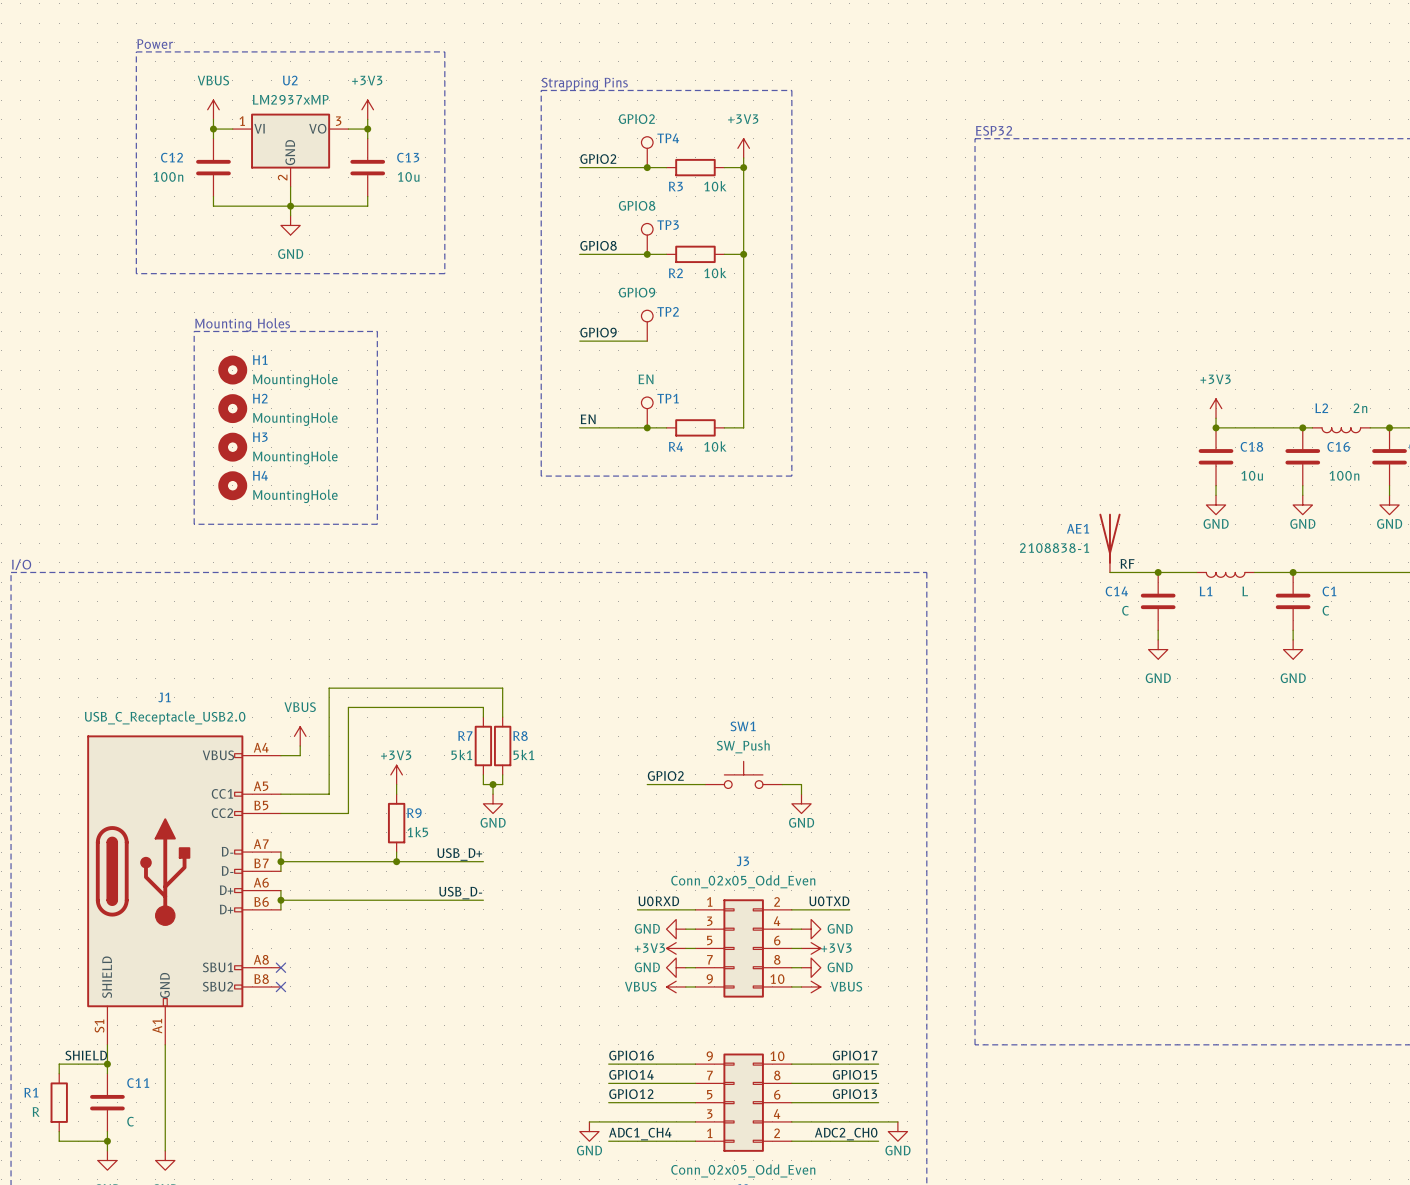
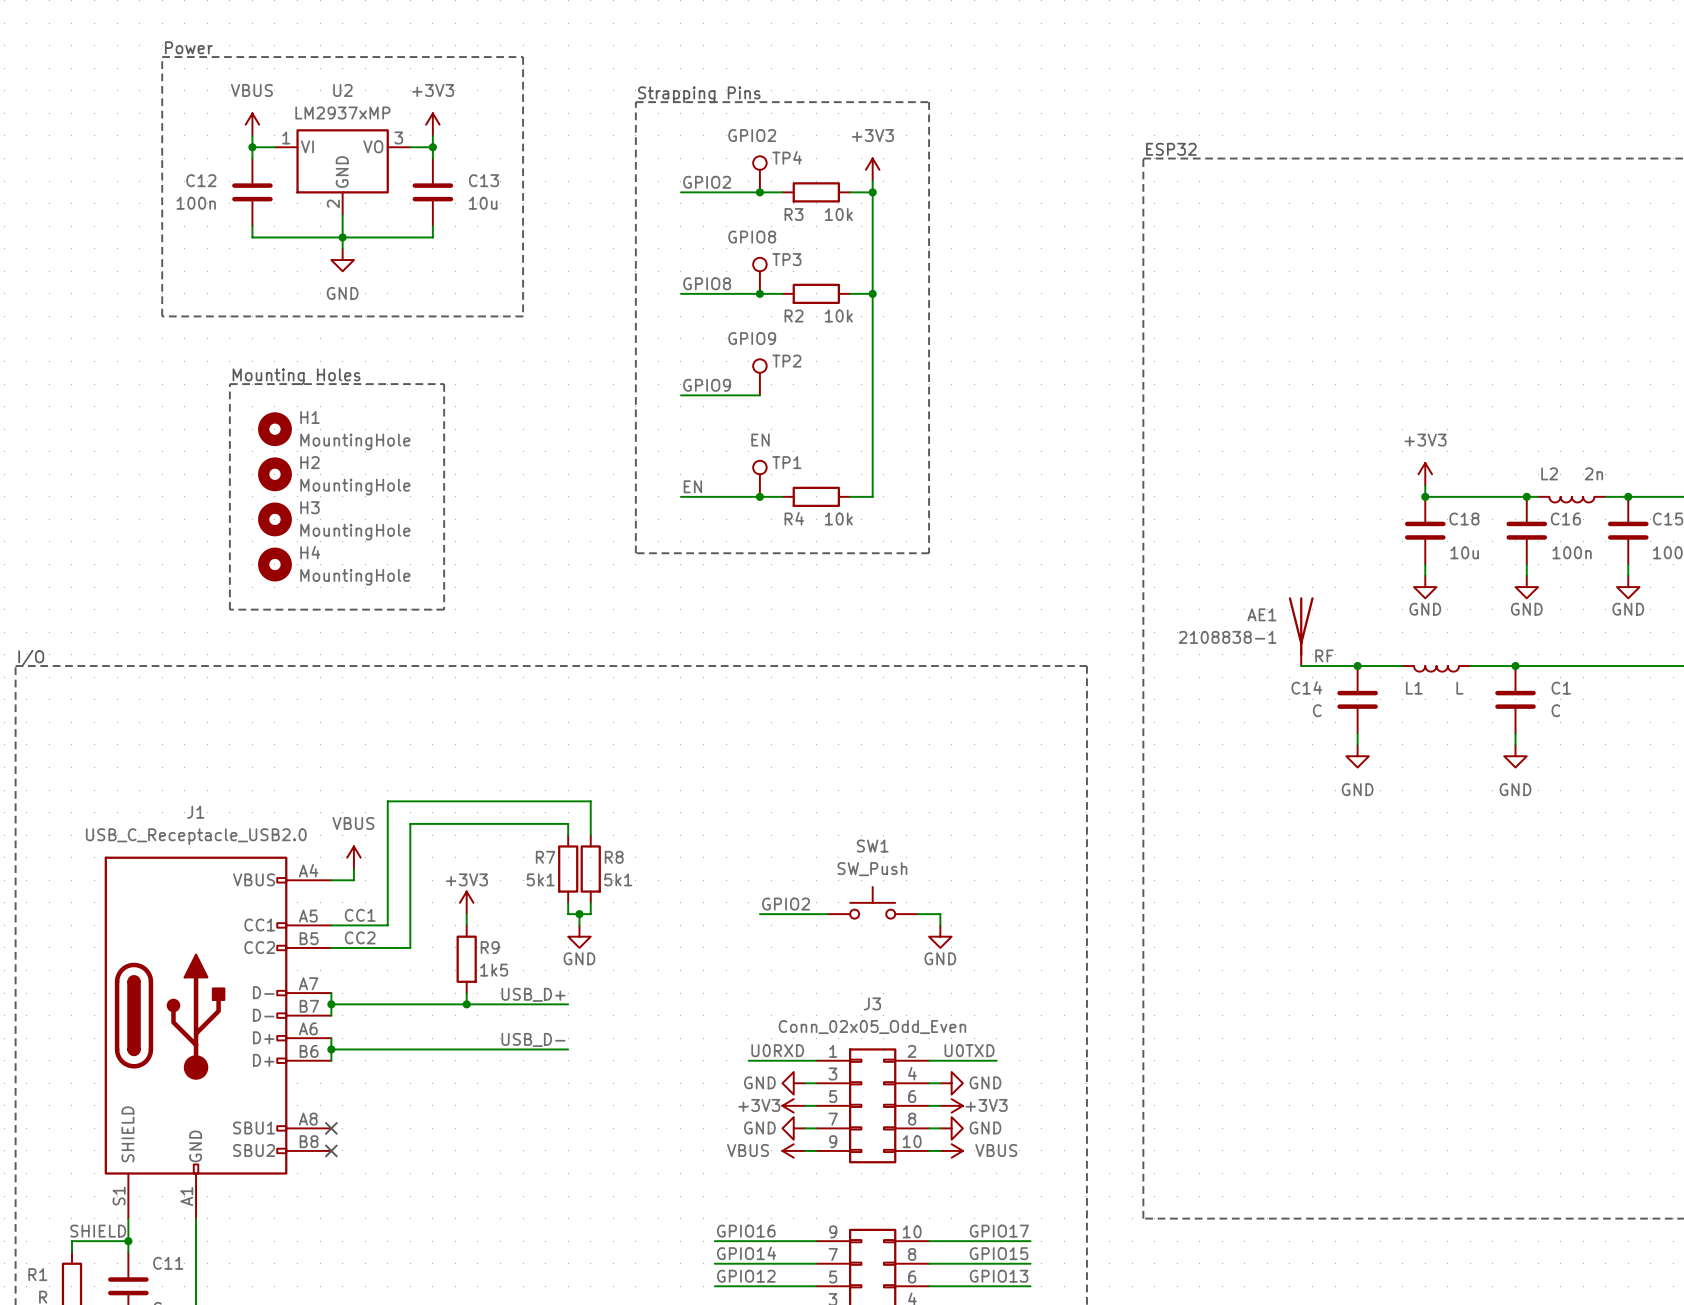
label: none -> CC1 (360, 915)
label: none -> CC2 (360, 937)

